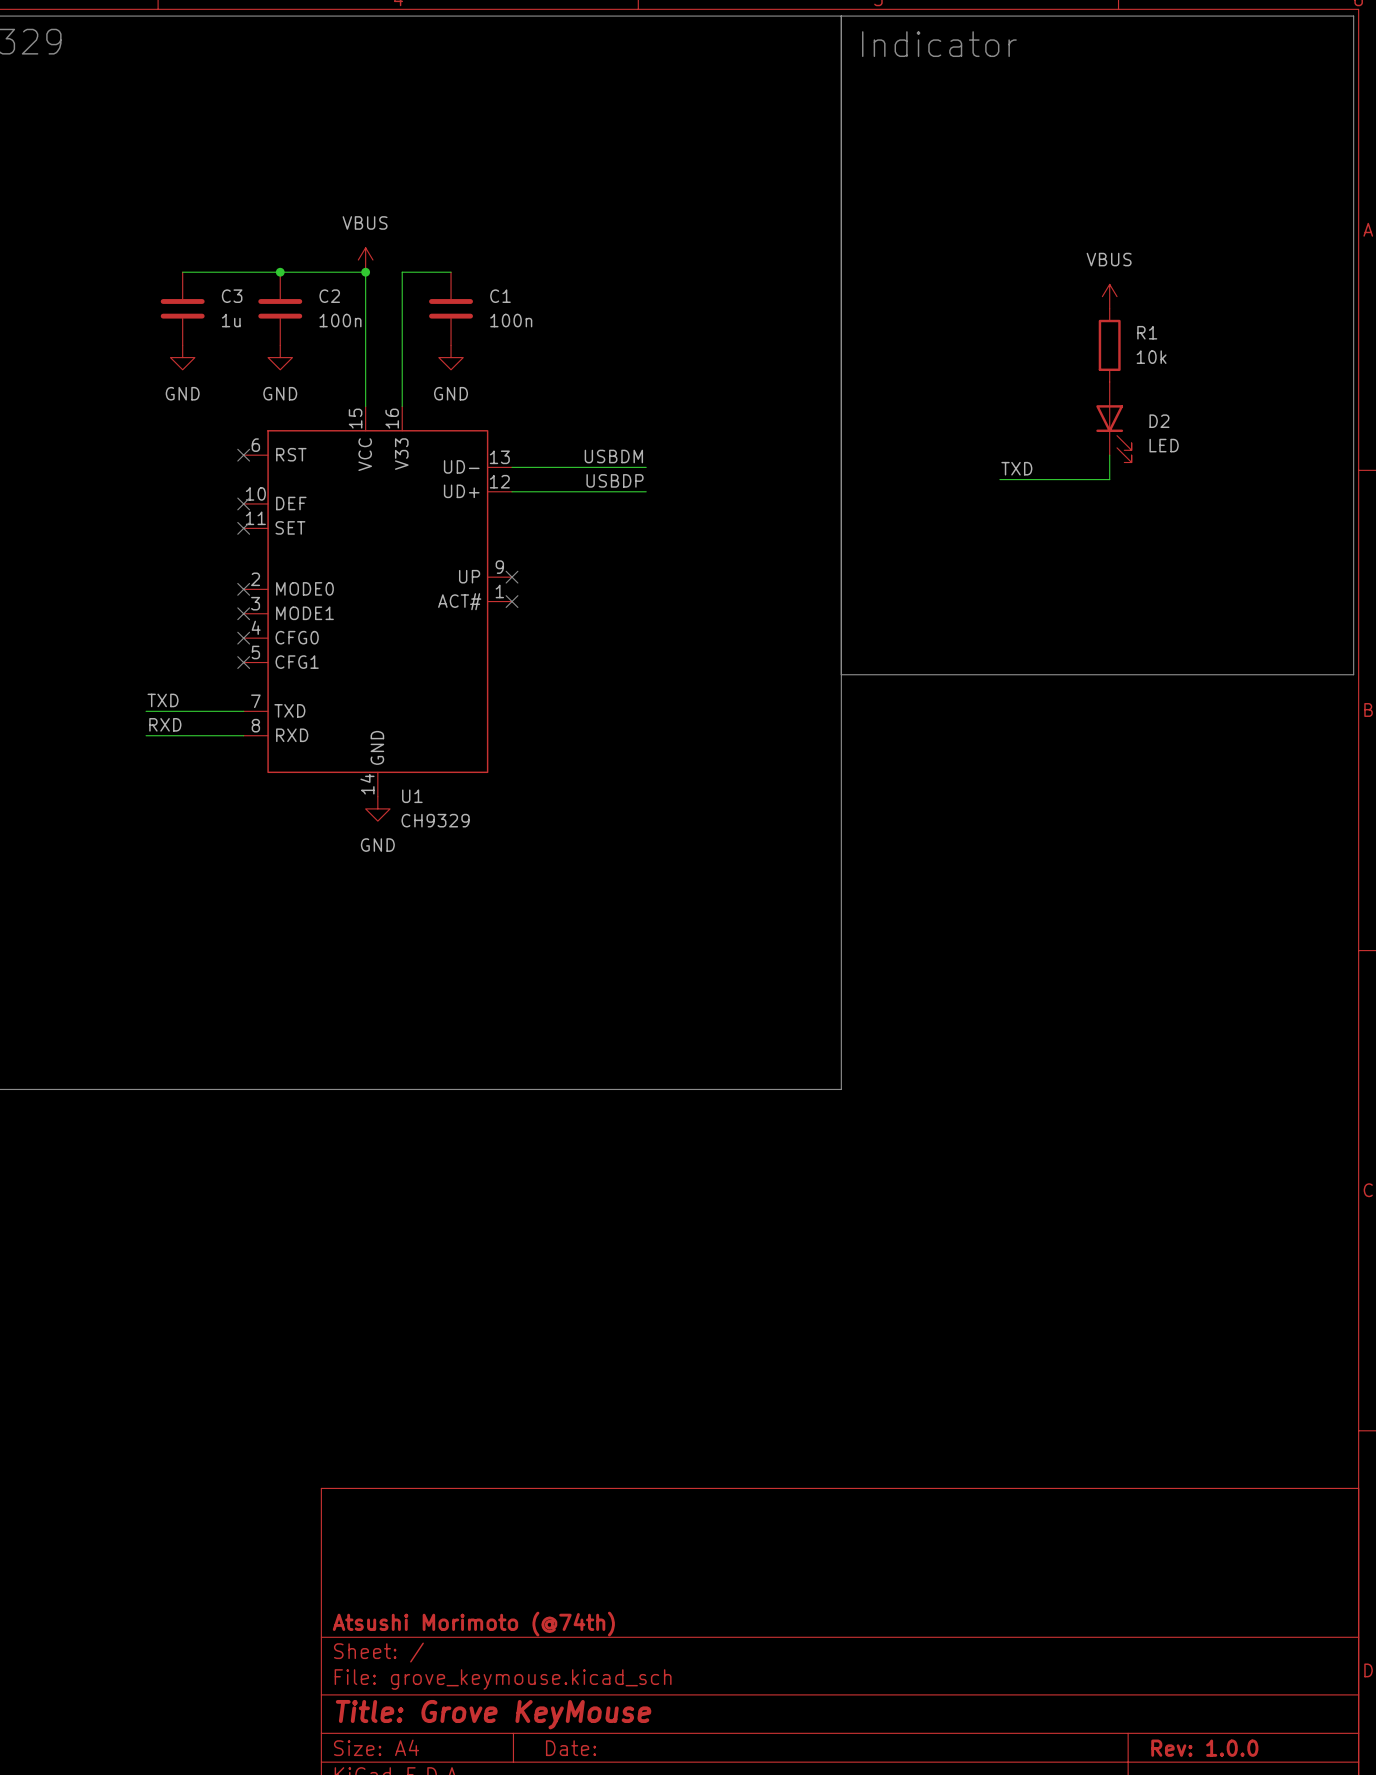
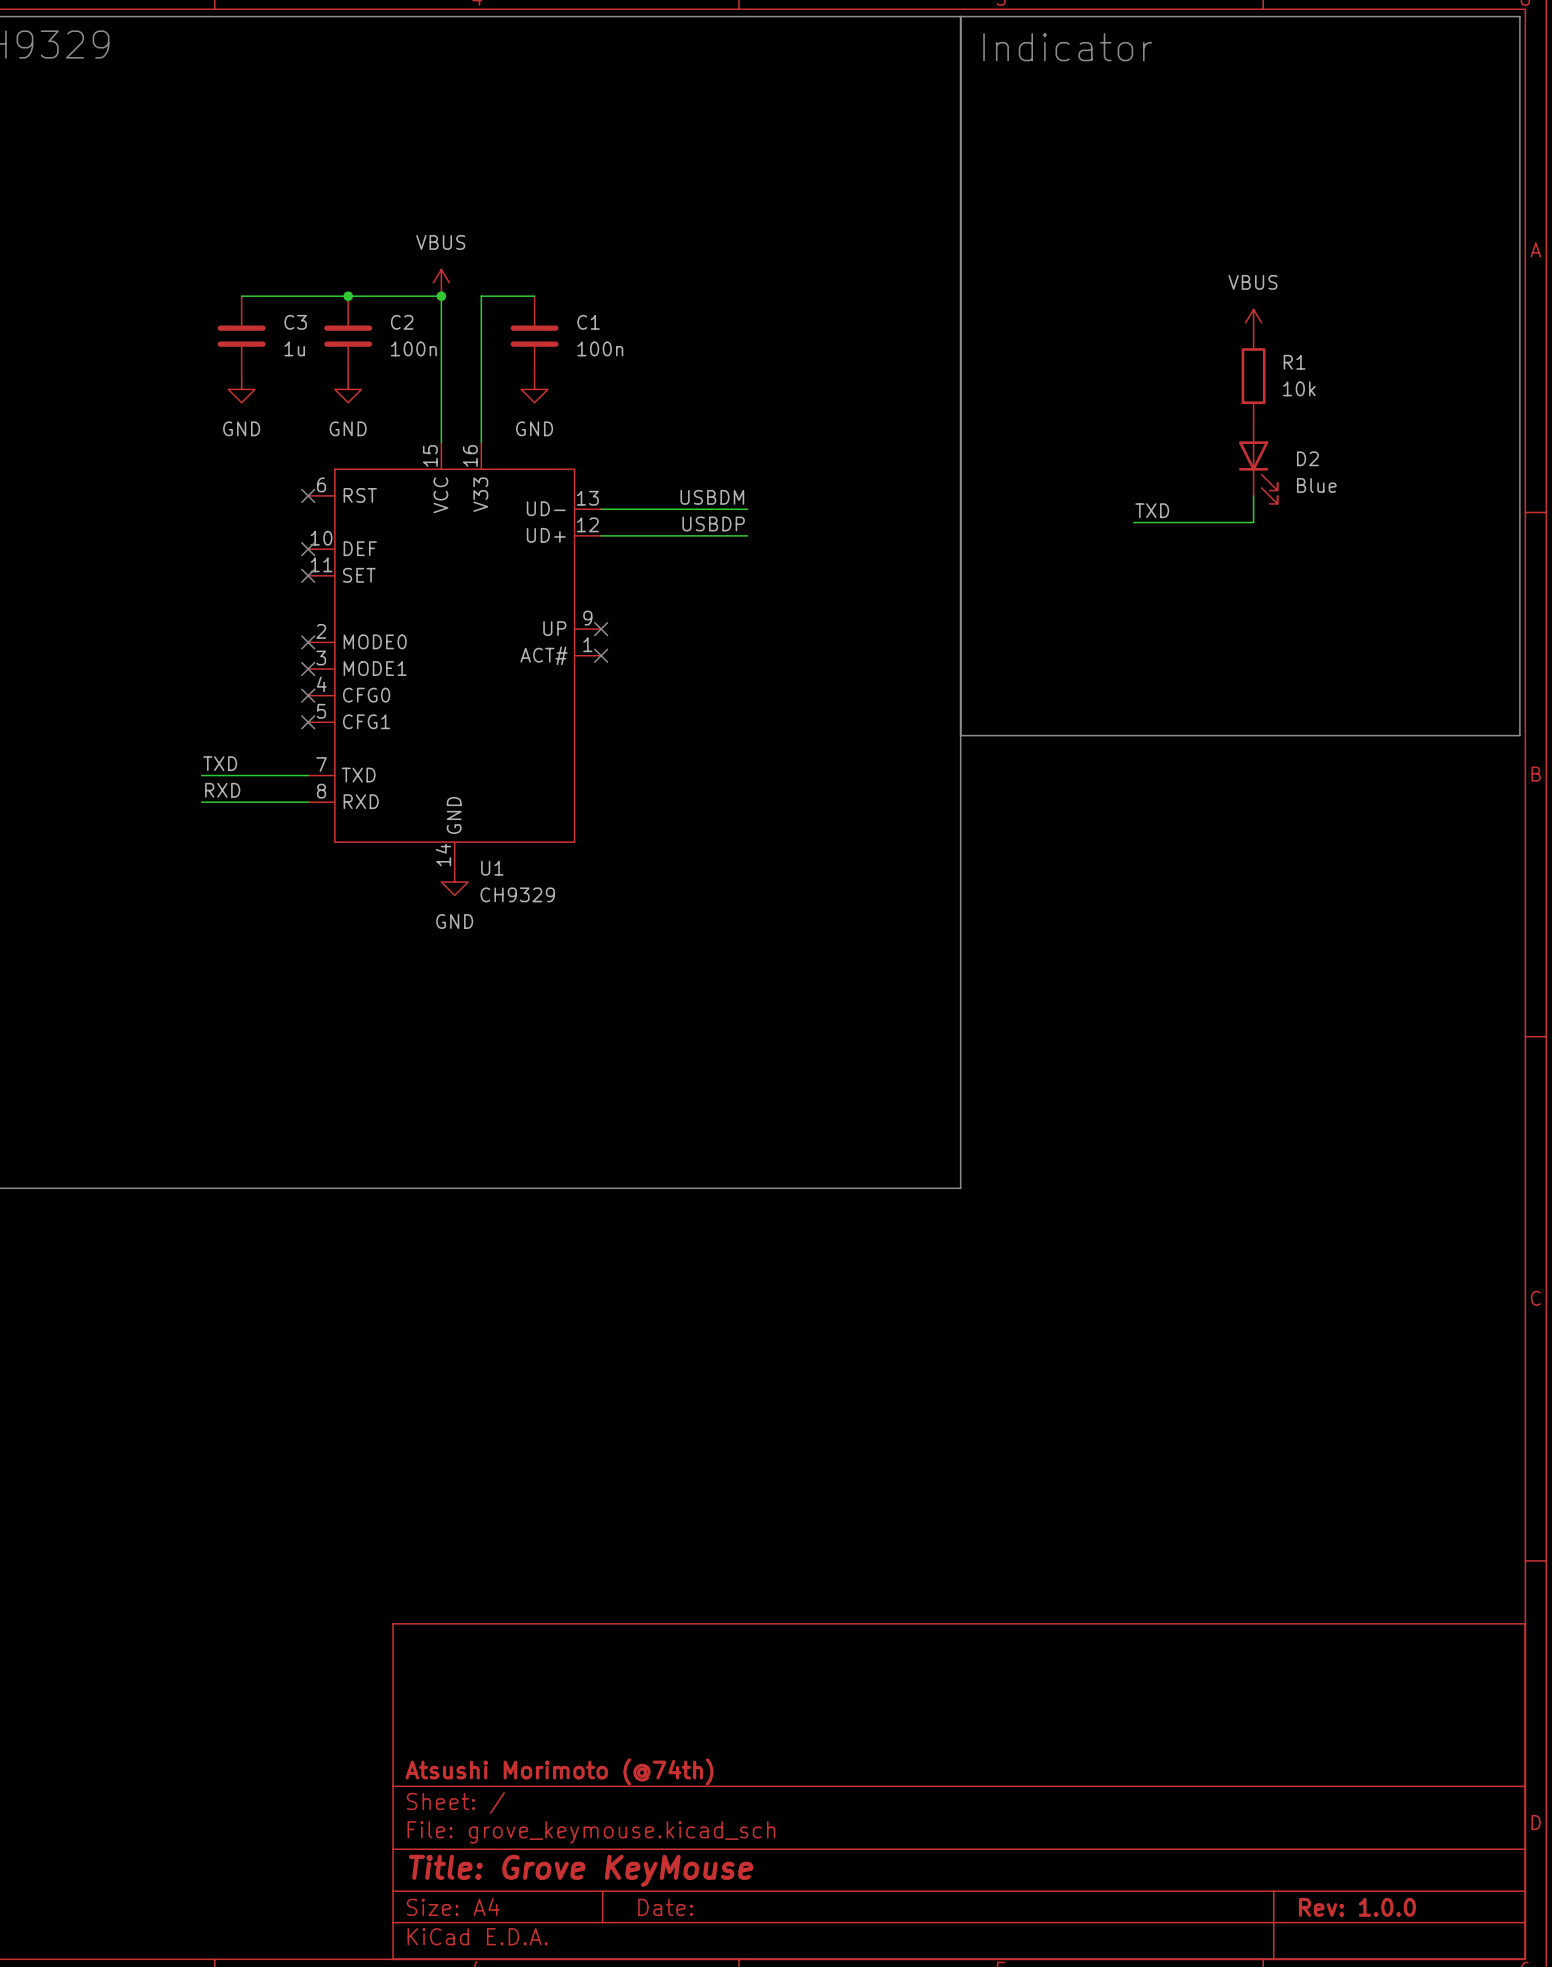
D2 value: LED (1164, 445) -> Blue (1316, 485)

